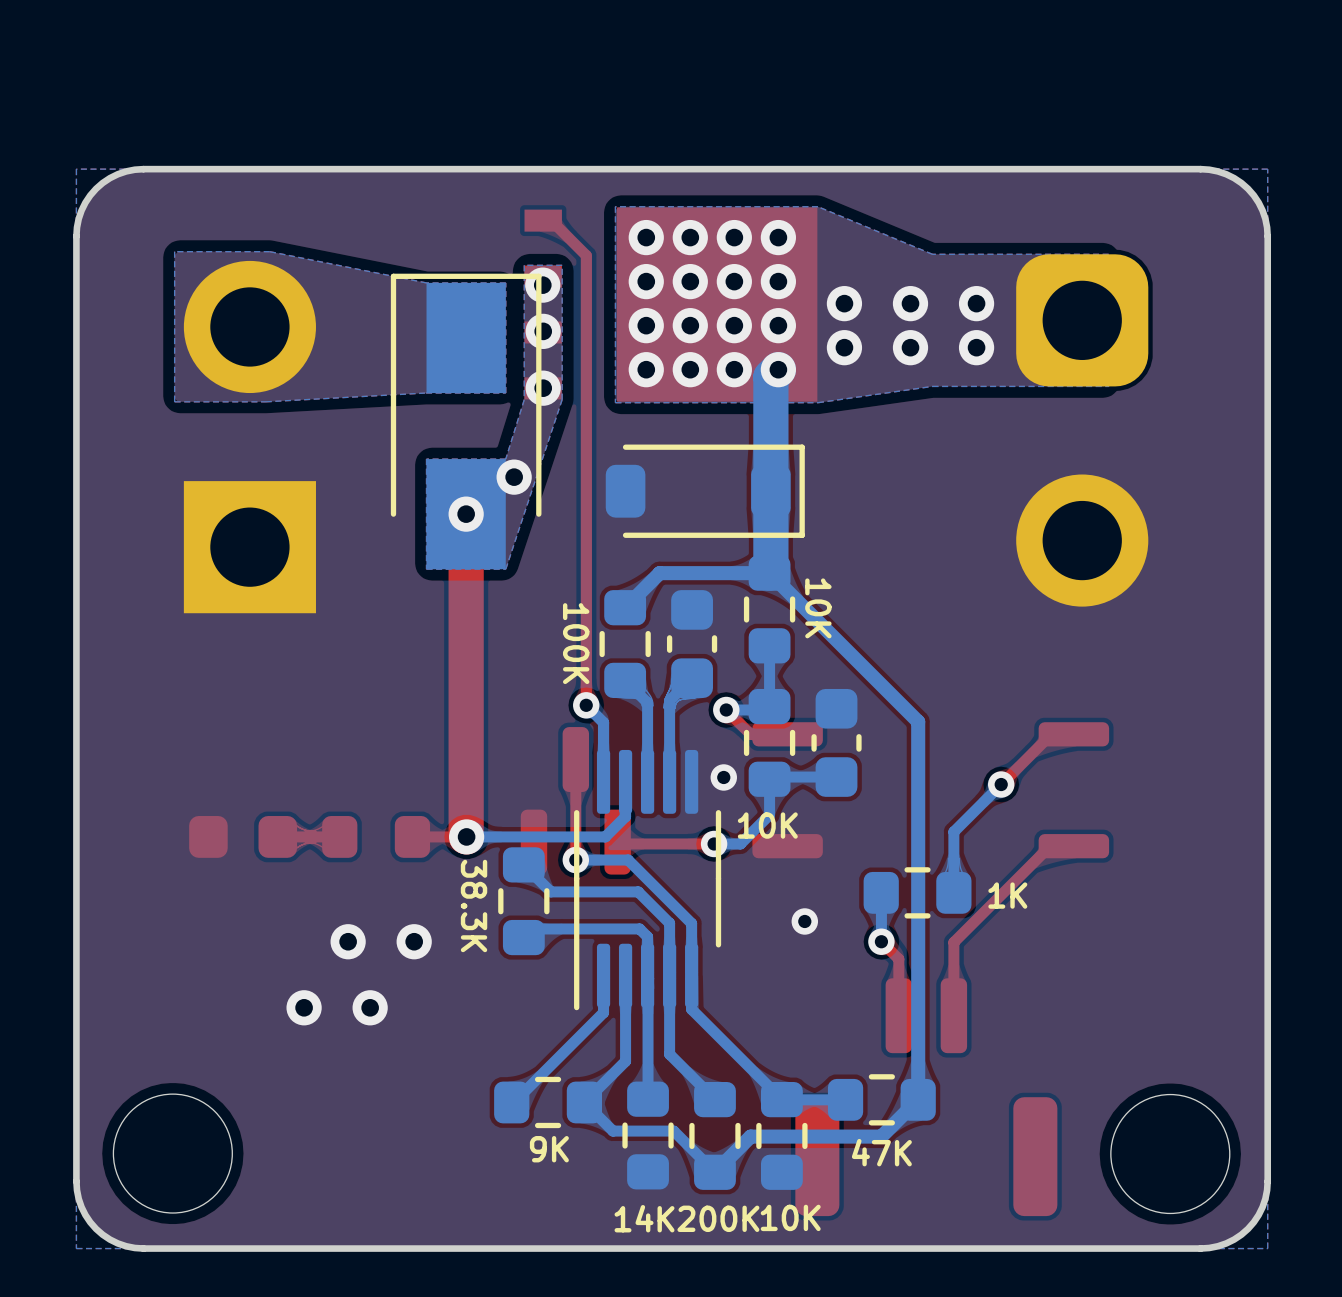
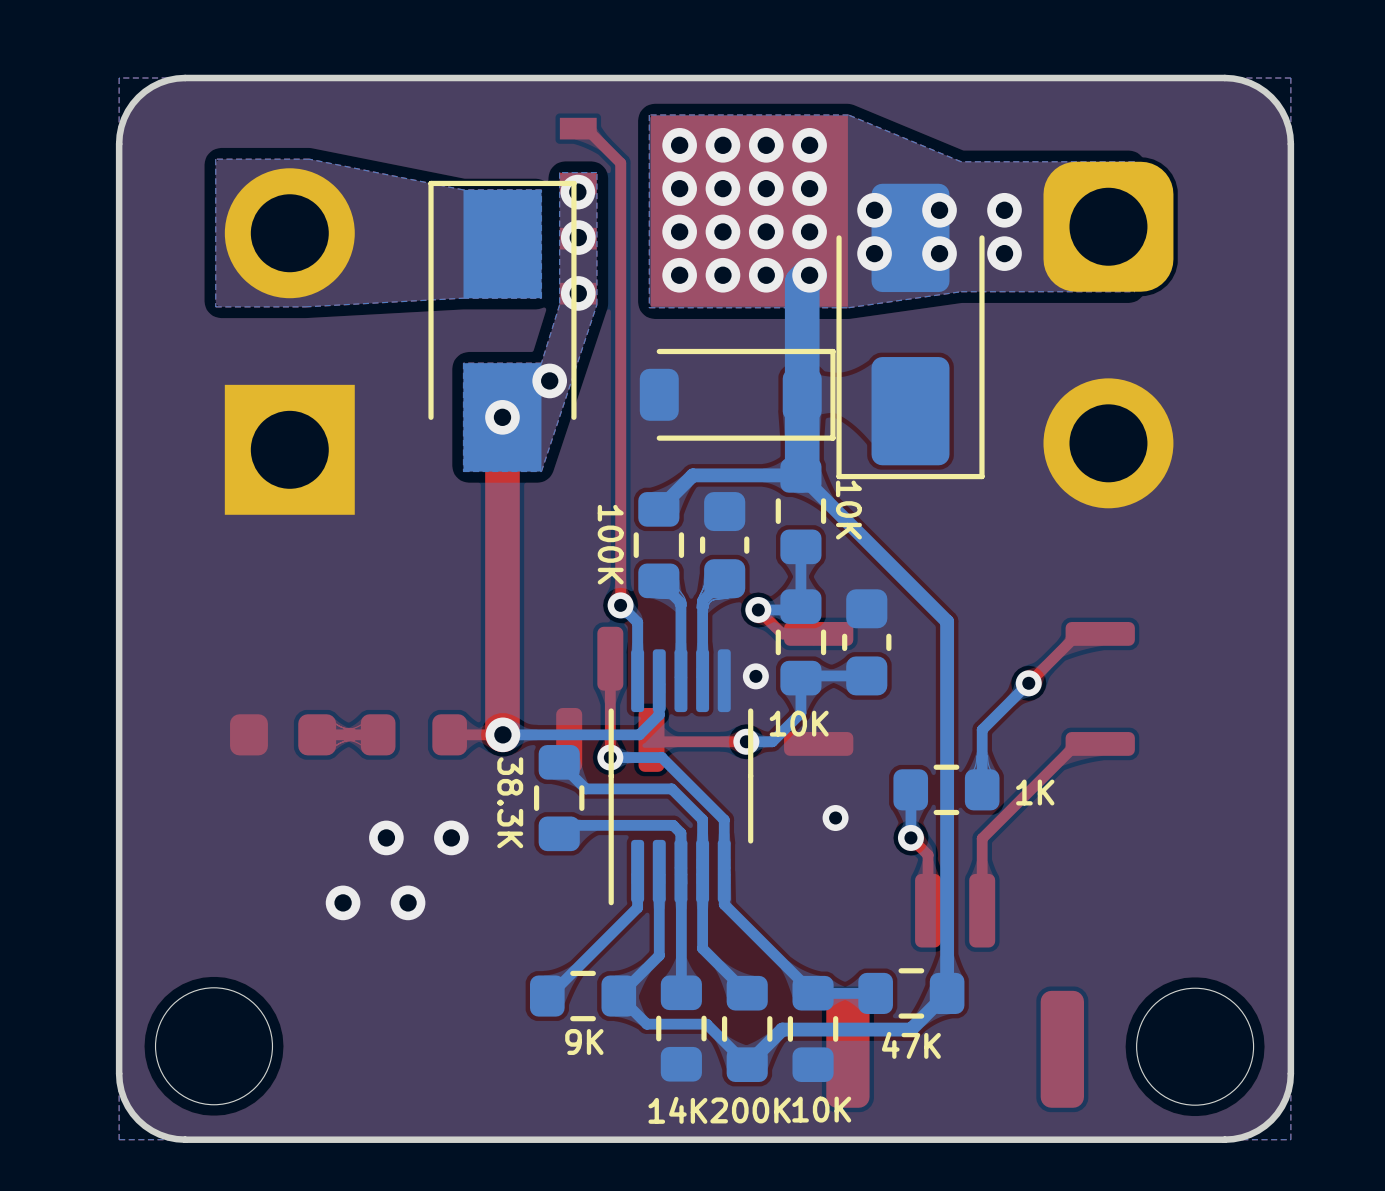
part: none -> (910, 331)

